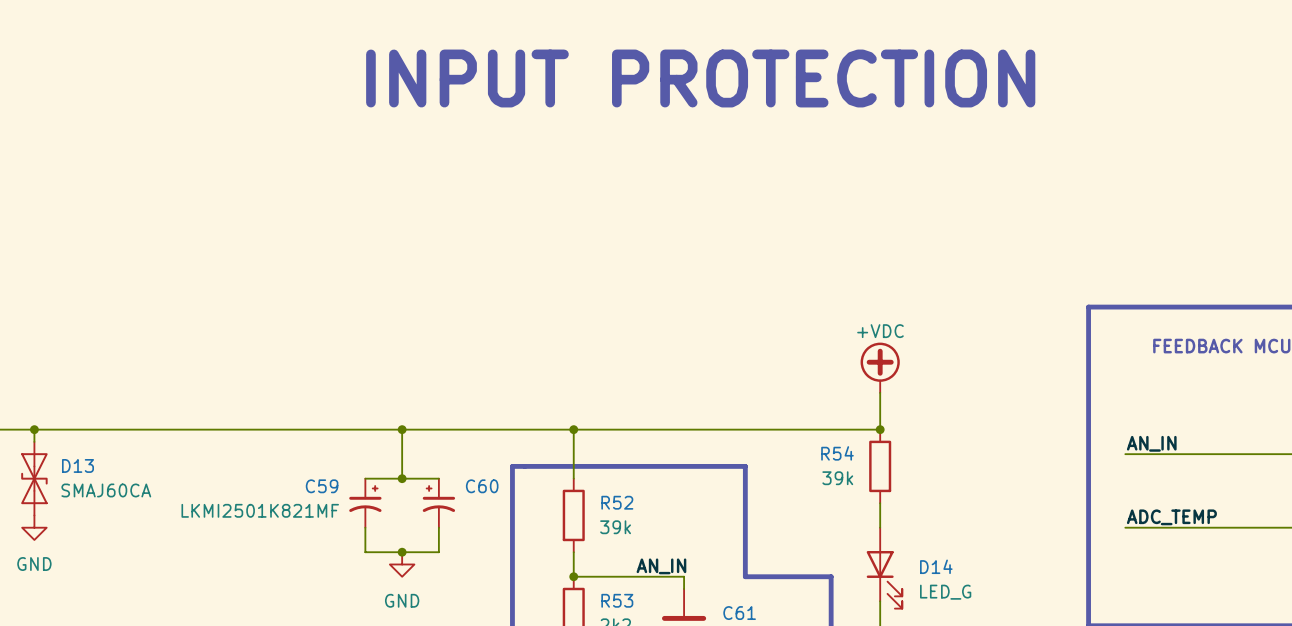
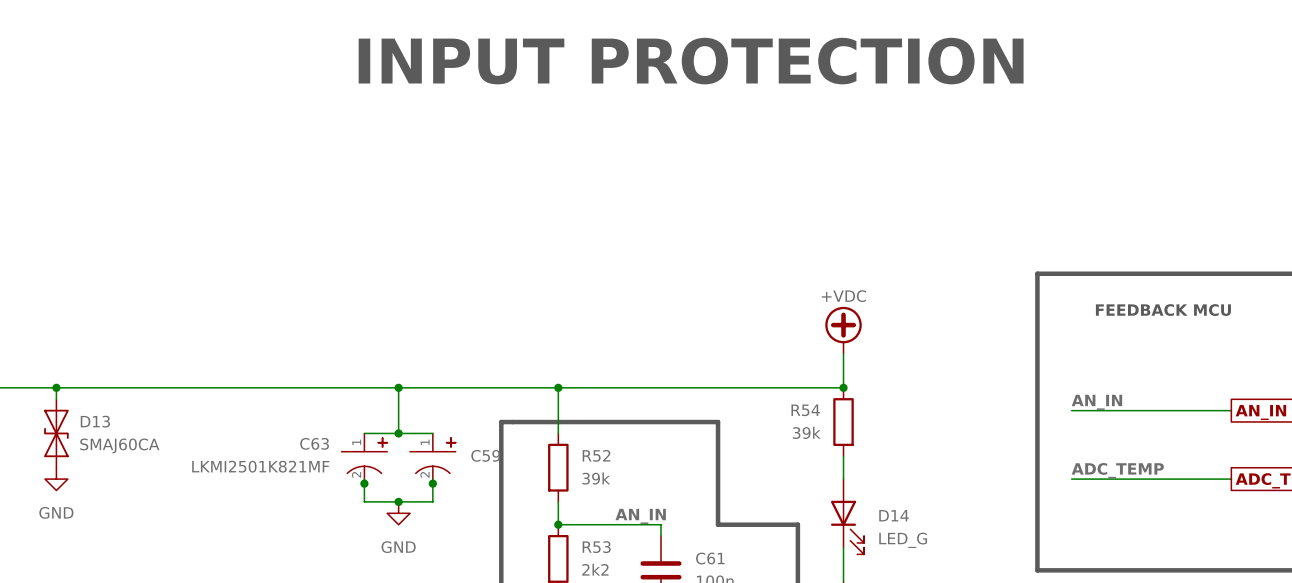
C59 symbol: [349, 478, 382, 528] -> [410, 433, 456, 484]
C59 name position: C59 (322, 486) -> C59 (485, 455)
C60: (438, 503) -> none
C63: none -> LKMI2501K821MF (364, 458)
C59 value: LKMI2501K821MF (260, 510) -> none
junction: none -> (364, 483)
junction: none -> (432, 483)

